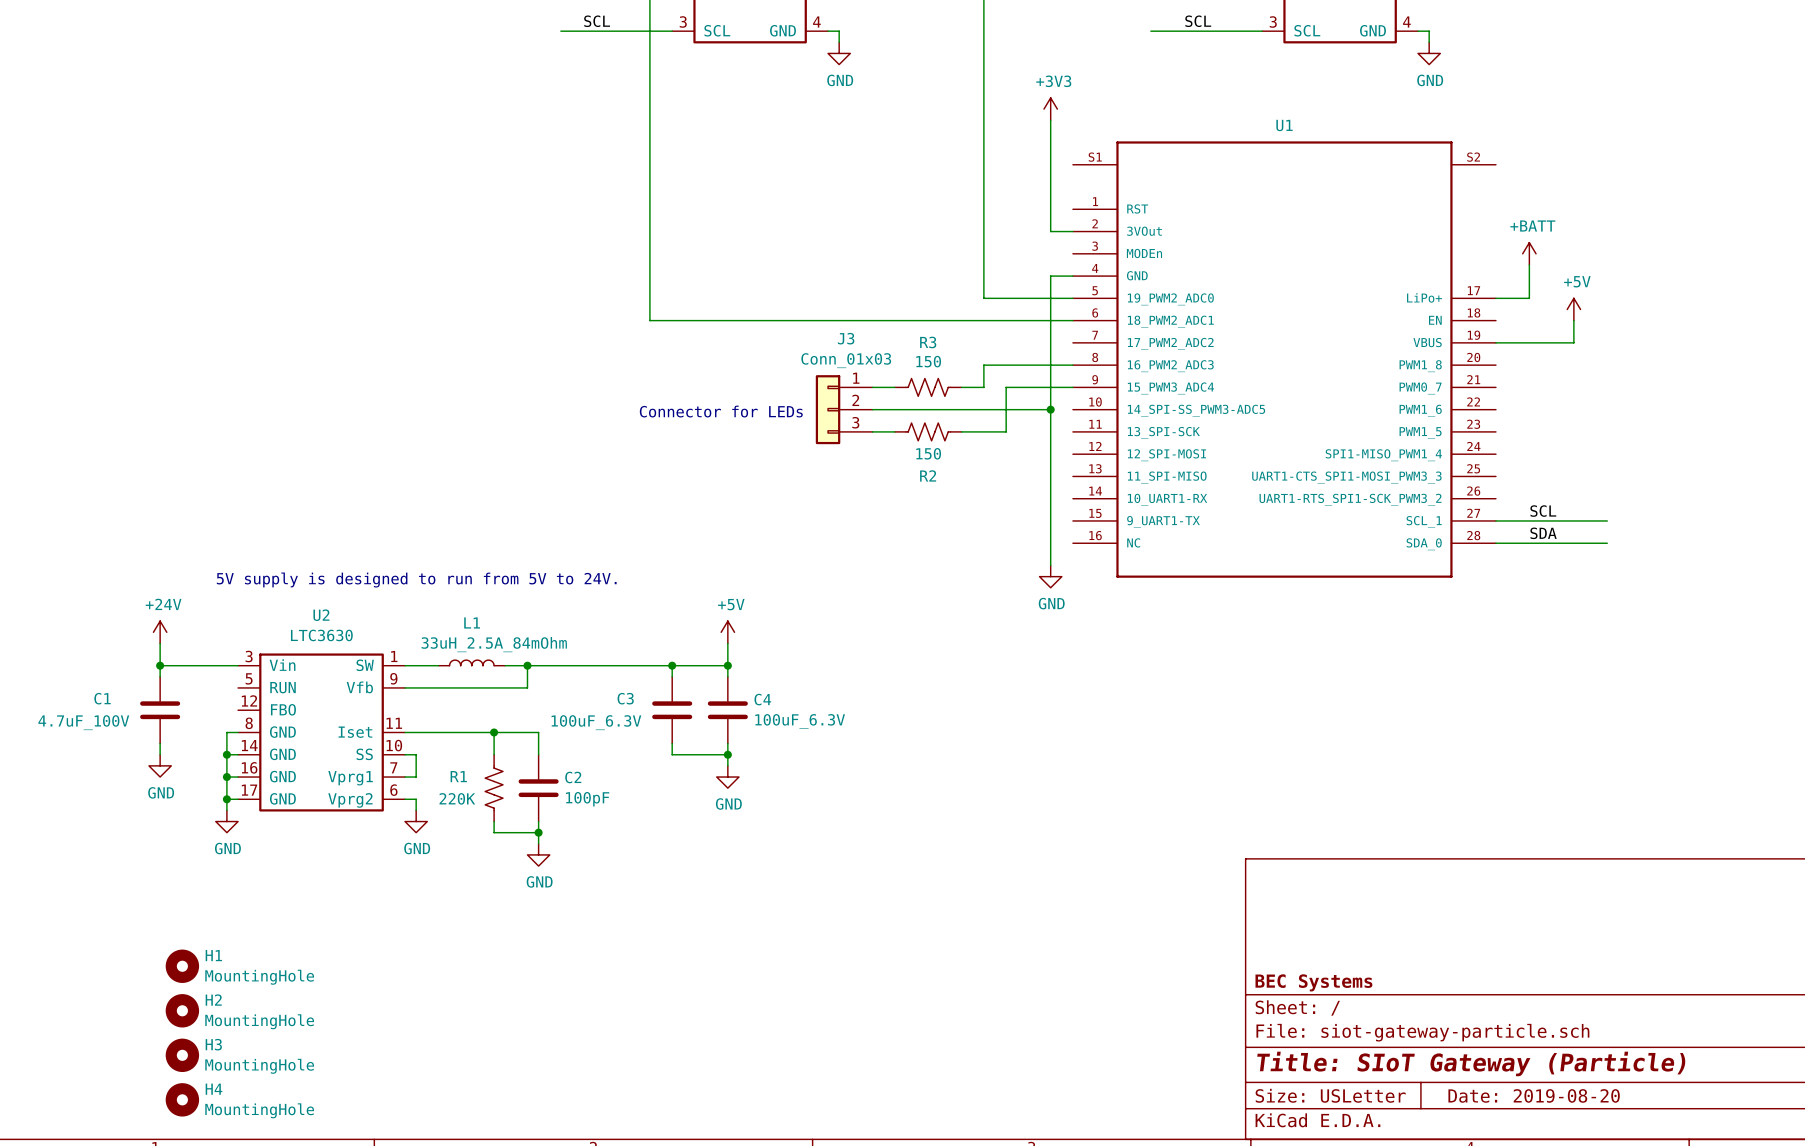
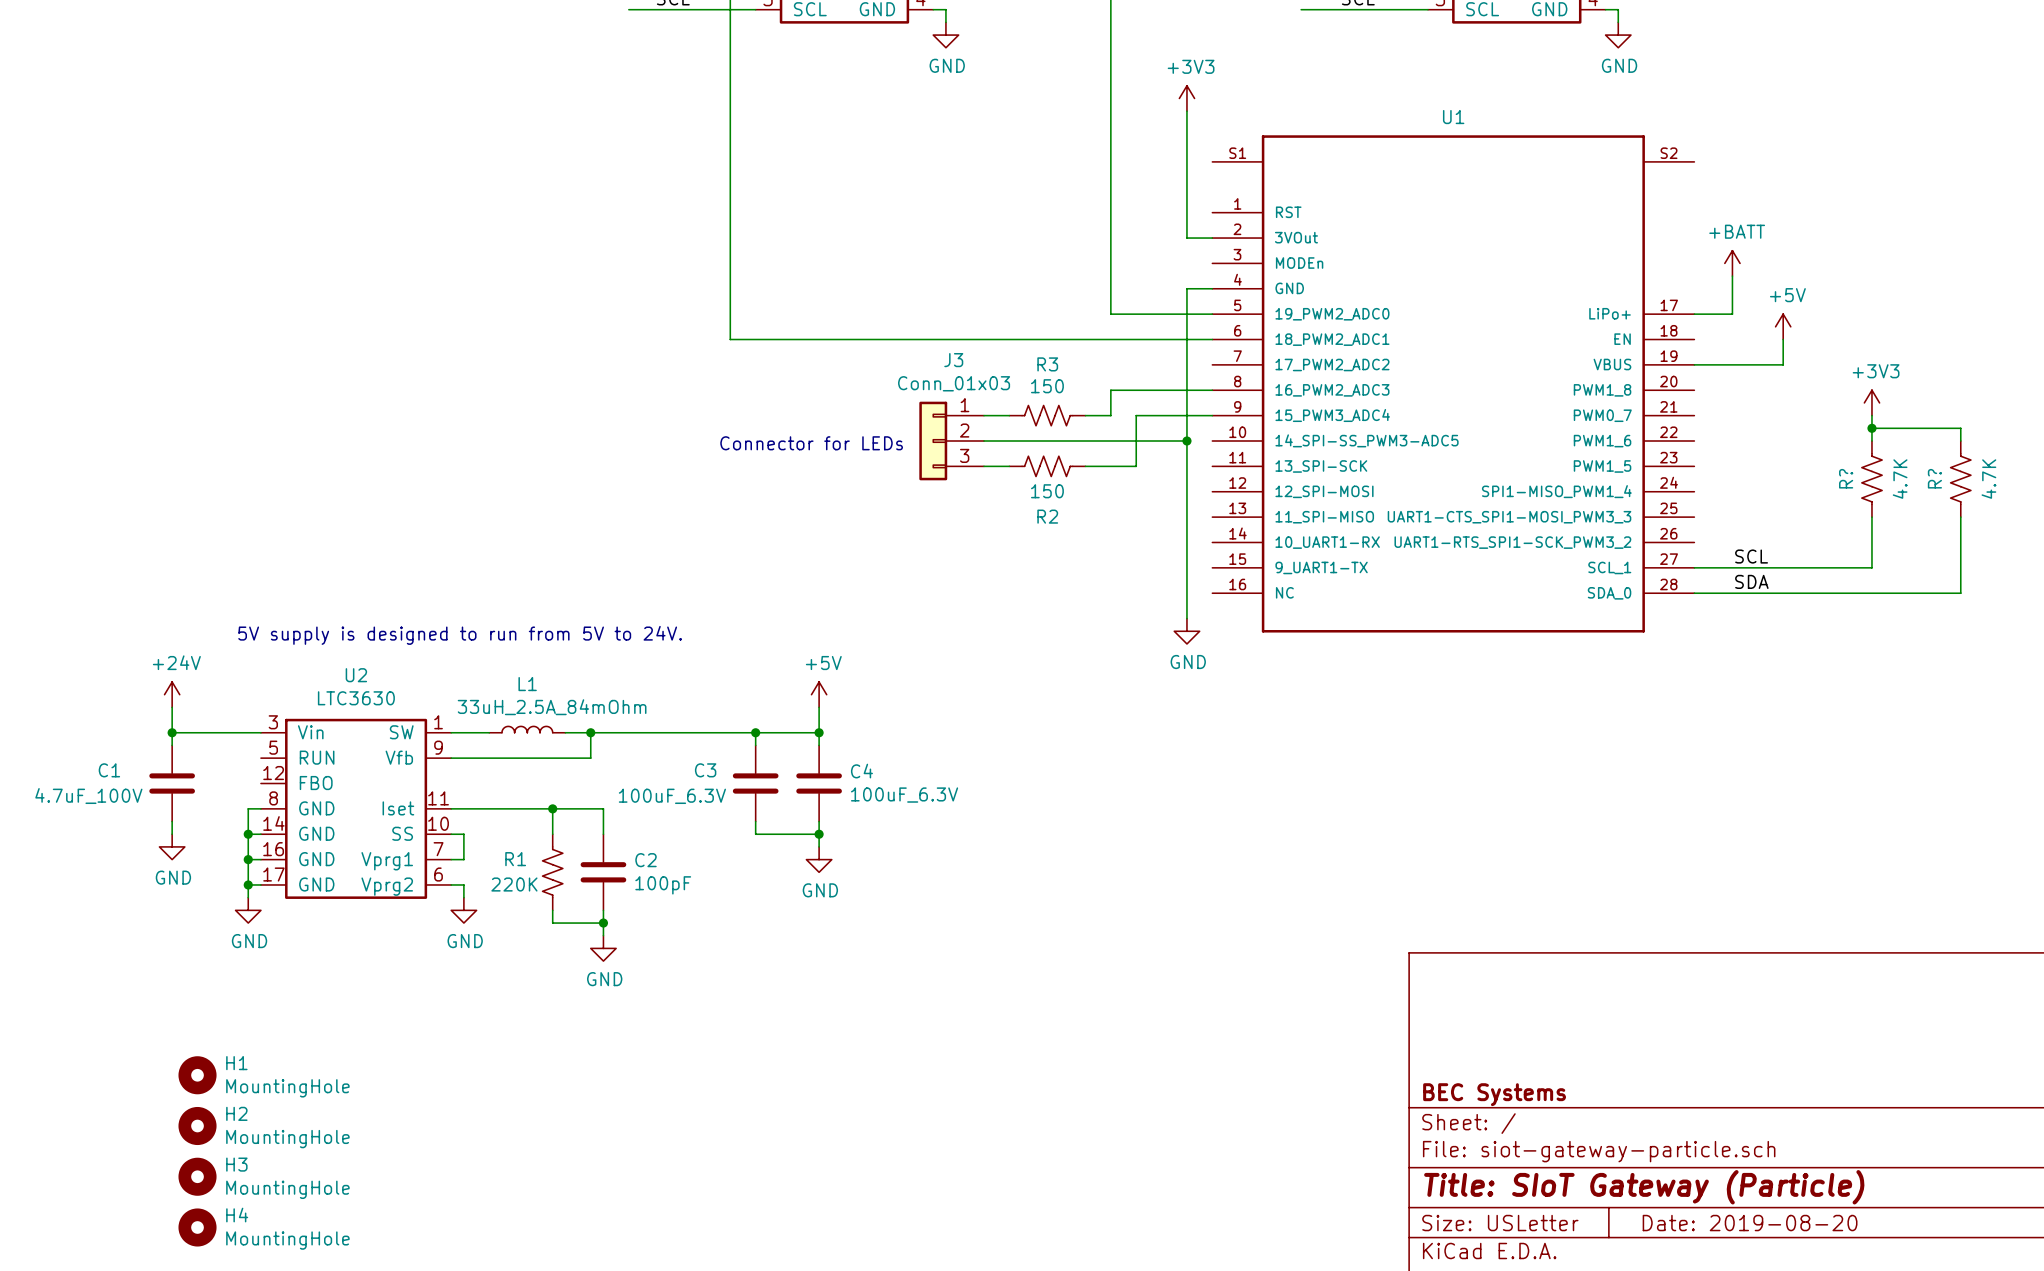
power symbol: none -> +3V3 (1871, 402)
wire: none -> (1871, 415) (1871, 440)
wire: none -> (1871, 428) (1960, 428) (1960, 440)
junction: none -> (1871, 428)
R?: none -> 4.7K (1871, 479)
R?: none -> 4.7K (1960, 479)
wire: none -> (1871, 517) (1871, 567) (1821, 567)
wire: none -> (1960, 517) (1960, 593) (1821, 593)

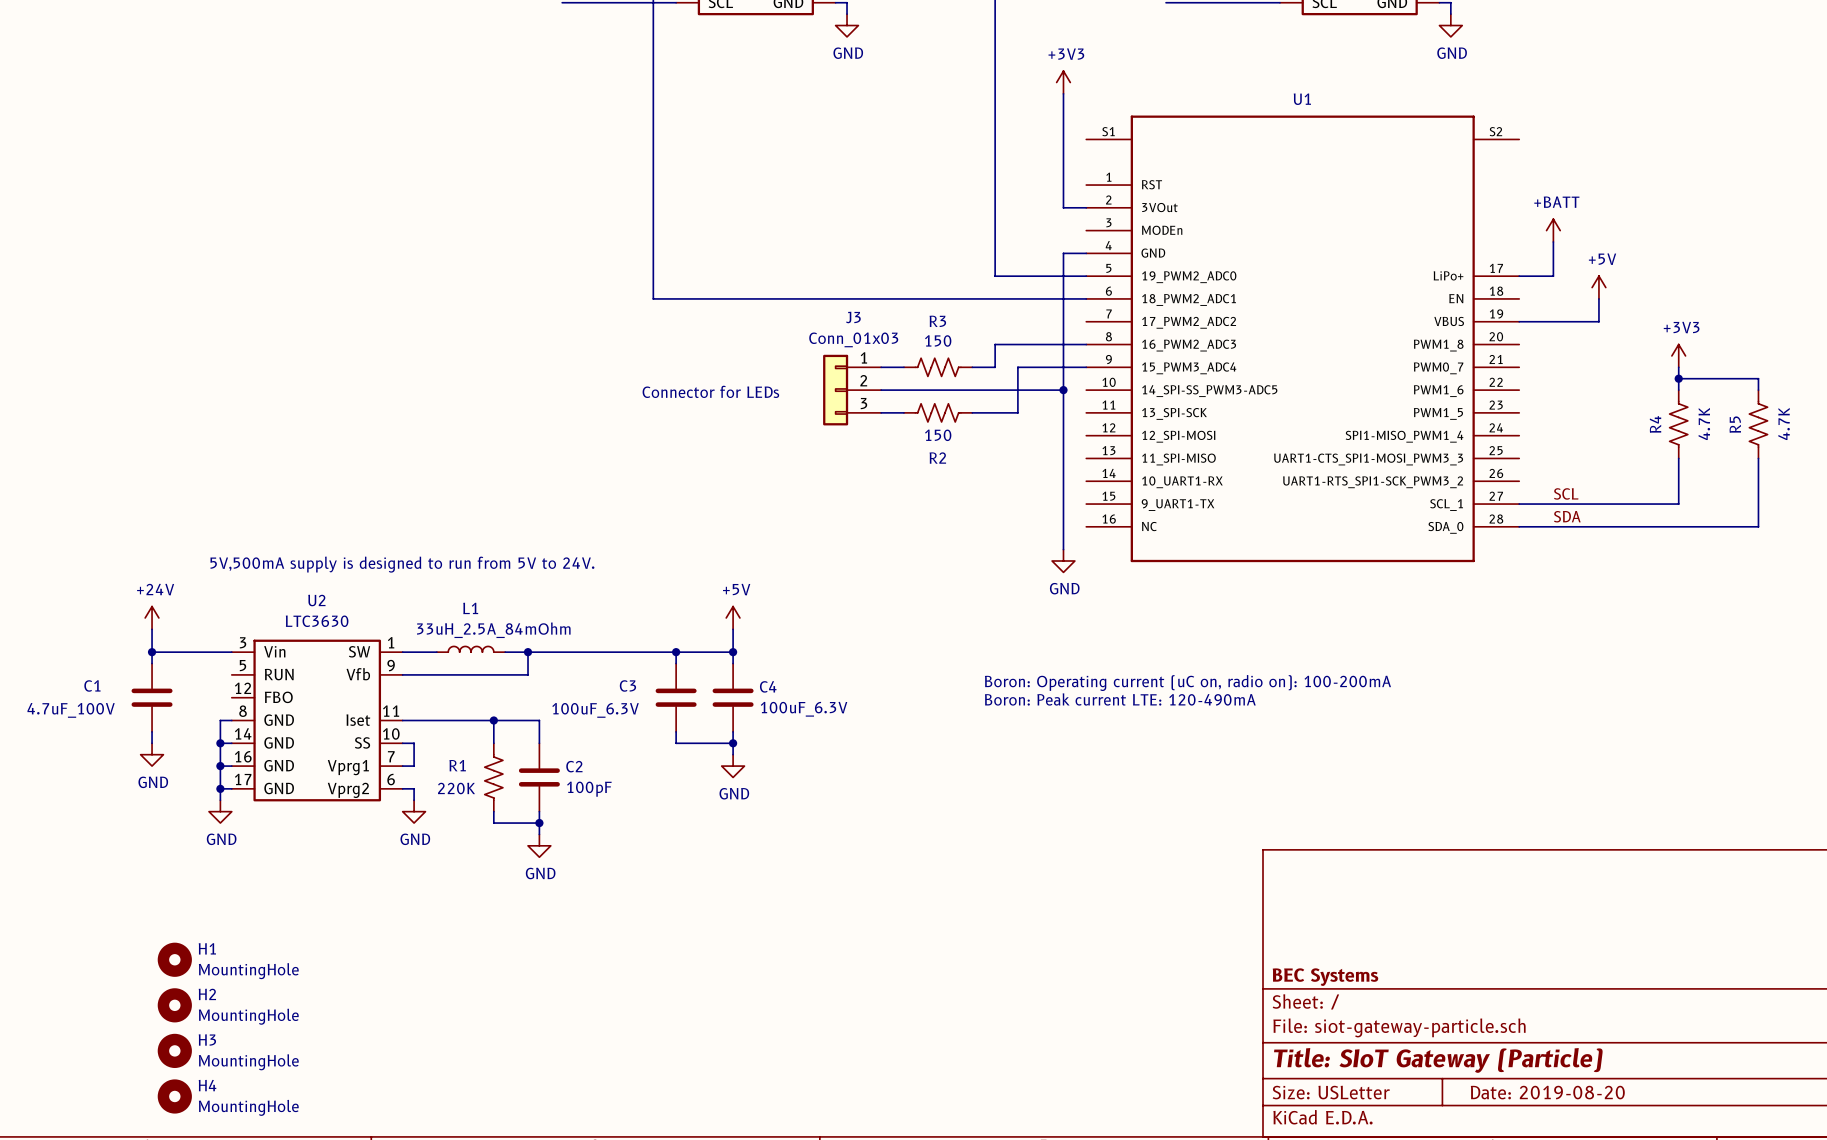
R? name: R? (1846, 478) -> R4 (1655, 424)
R? name: R? (1934, 478) -> R5 (1735, 424)
text: 5V supply is designed to run from 5V to 24V. (460, 635) -> 5V,500mA supply is designed to run from 5V to 24V. (402, 564)
text: none -> Boron: Operating current (uC on, radio on): 100-200mA (1187, 683)
text: none -> Boron: Peak current LTE: 120-490mA (1120, 699)

